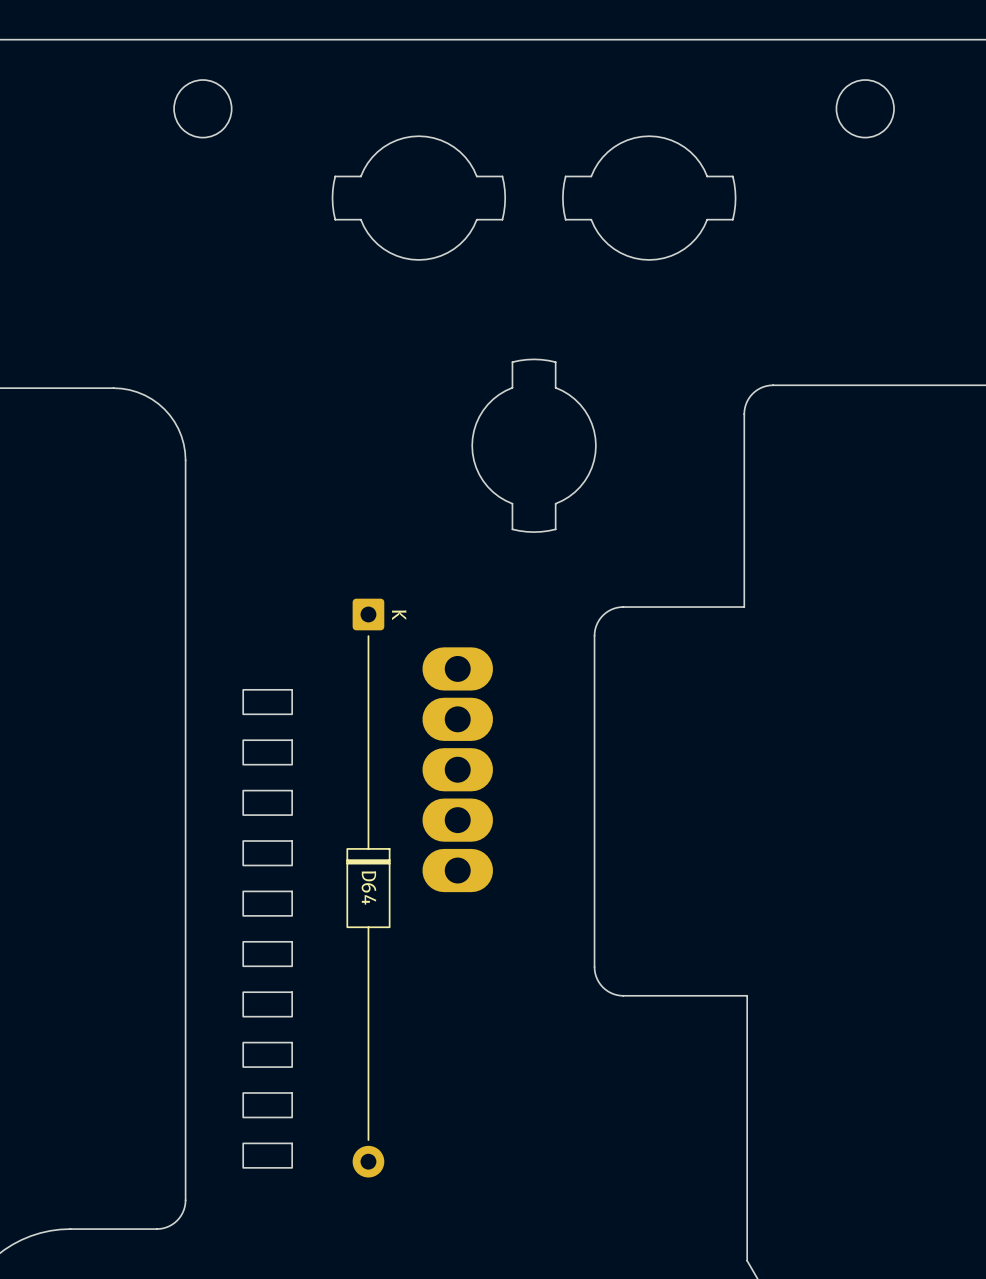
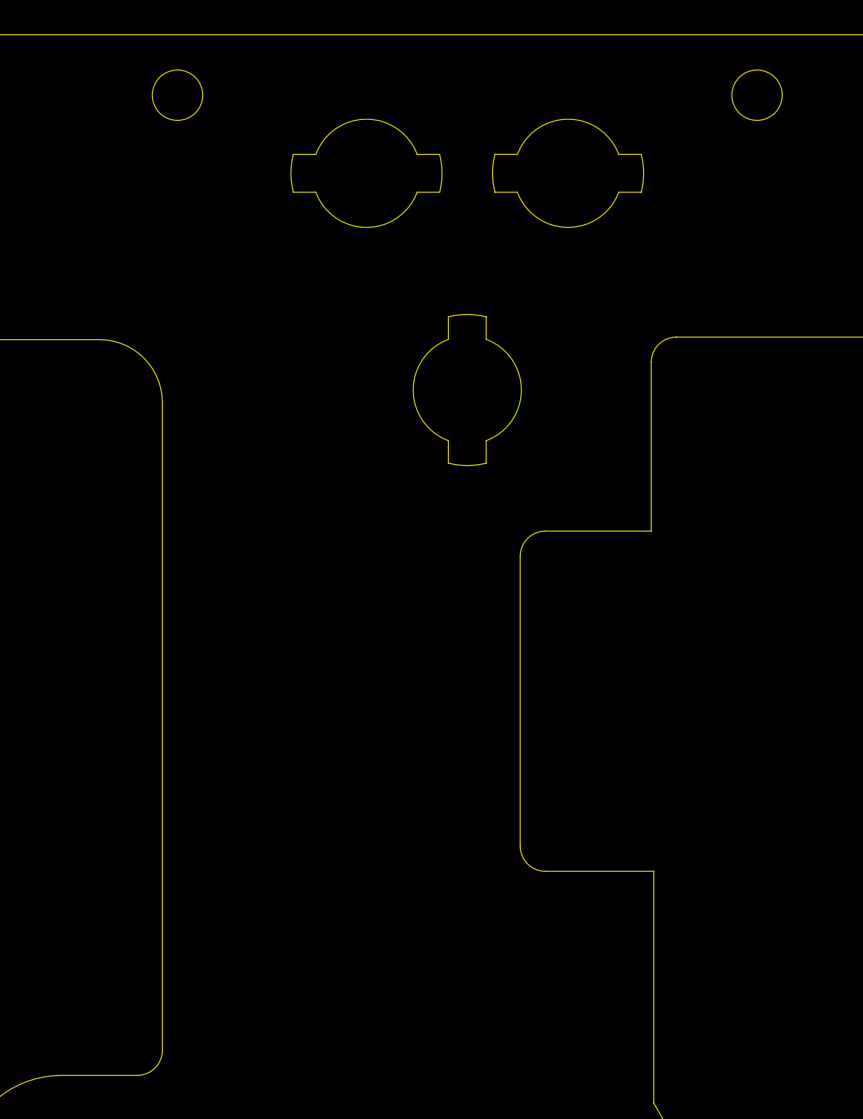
part: (457, 769) -> none
D64: (368, 888) -> none
part: (267, 928) -> none

